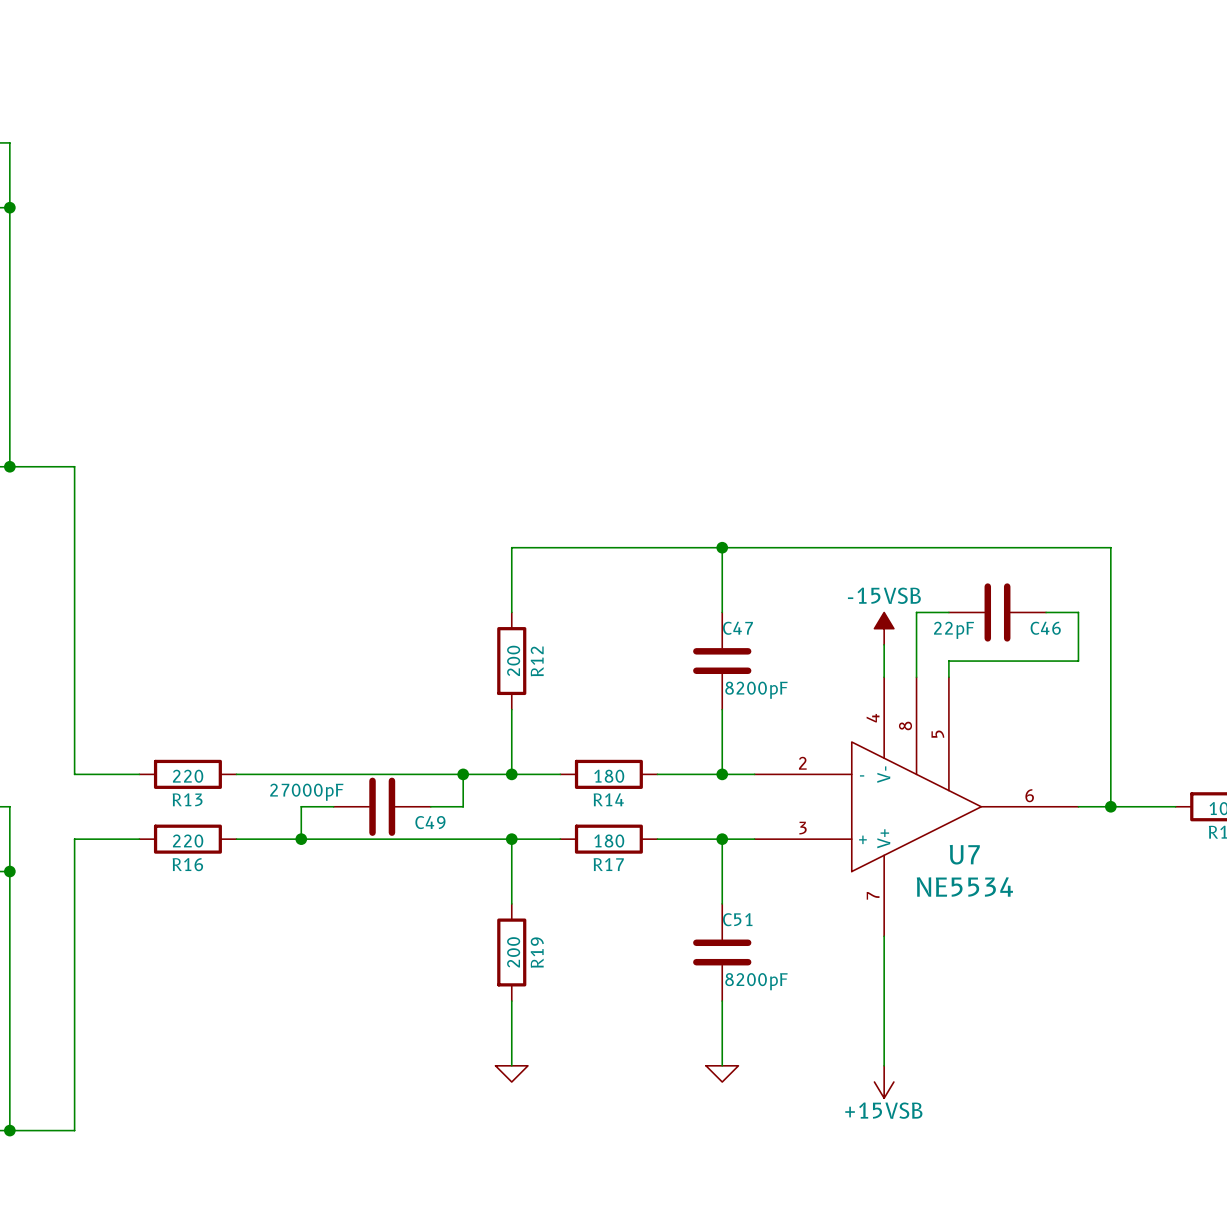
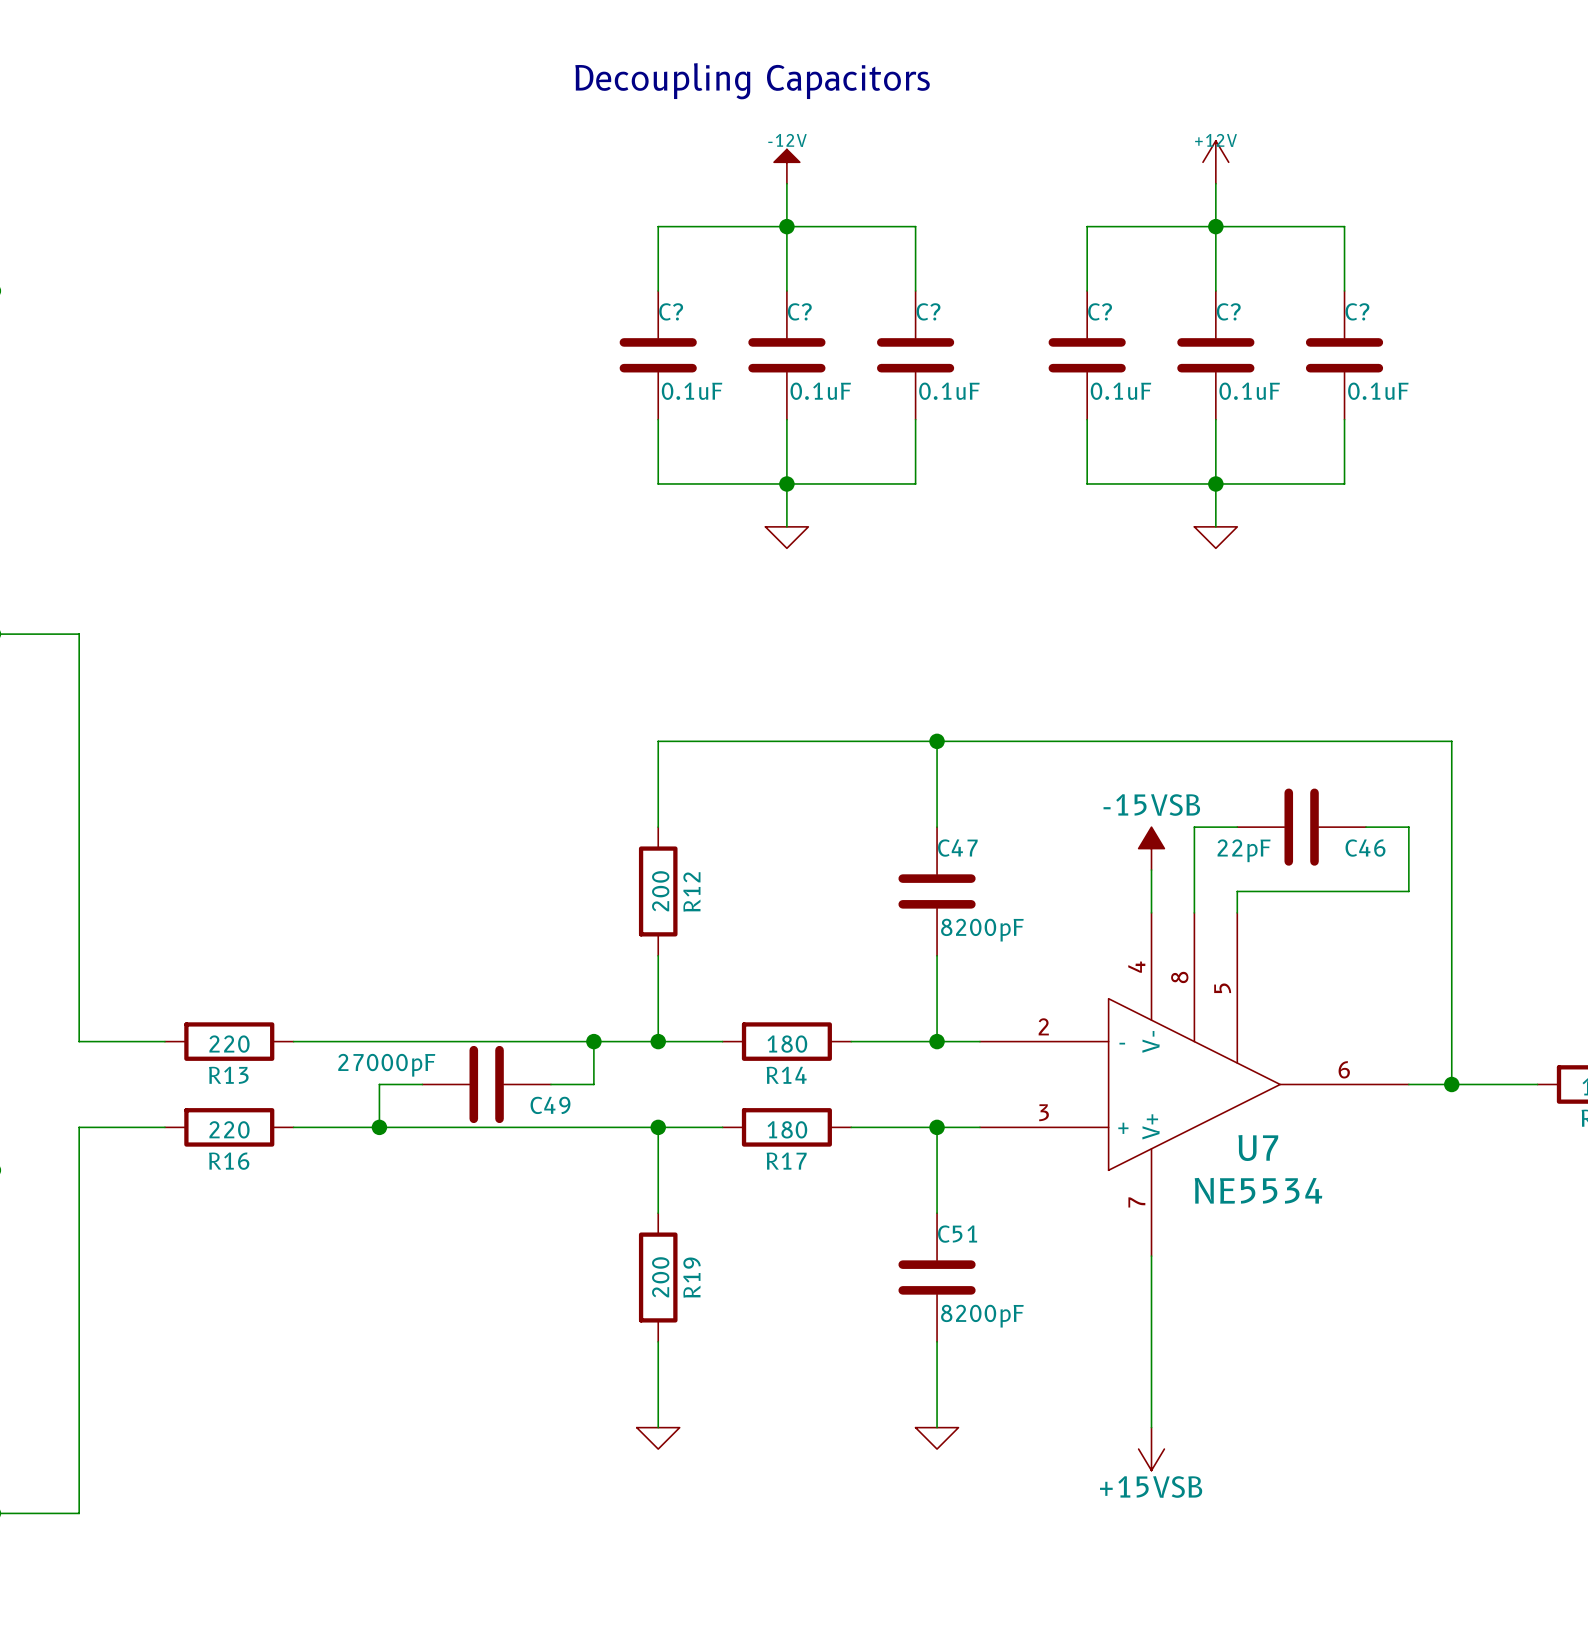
text: none -> Decoupling Capacitors (752, 81)
power symbol: none -> +12V (1215, 162)
power symbol: none -> -12V (786, 166)
wire: none -> (786, 183) (786, 290)
wire: none -> (1215, 183) (1215, 290)
junction: none -> (786, 226)
junction: none -> (1215, 226)
wire: none -> (658, 290) (658, 226) (915, 226) (915, 290)
wire: none -> (1087, 290) (1087, 226) (1344, 226) (1344, 290)
C?: none -> 0.1uF (658, 355)
C?: none -> 0.1uF (786, 355)
C?: none -> 0.1uF (915, 355)
C?: none -> 0.1uF (1087, 355)
C?: none -> 0.1uF (1215, 355)
C?: none -> 0.1uF (1344, 355)
wire: none -> (658, 419) (658, 483) (915, 483) (915, 419)
wire: none -> (786, 419) (786, 526)
wire: none -> (1087, 419) (1087, 483) (1344, 483) (1344, 419)
wire: none -> (1215, 419) (1215, 526)
junction: none -> (786, 483)
junction: none -> (1215, 483)
power symbol: none -> (786, 537)
power symbol: none -> (1215, 537)

